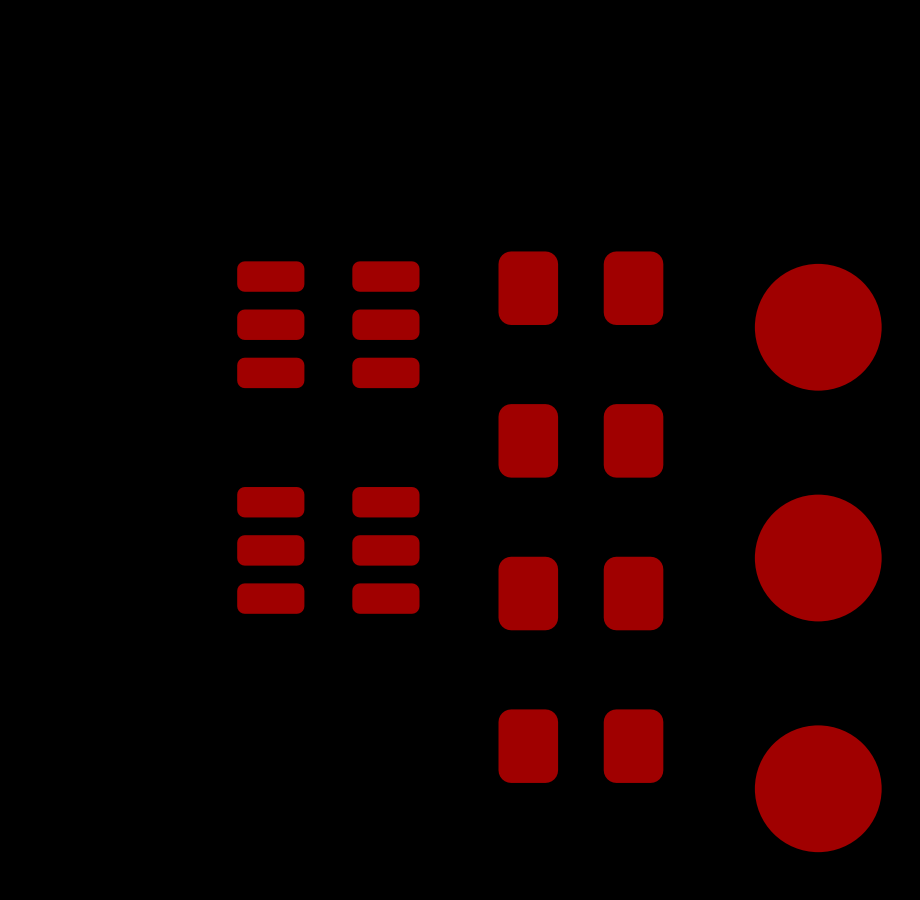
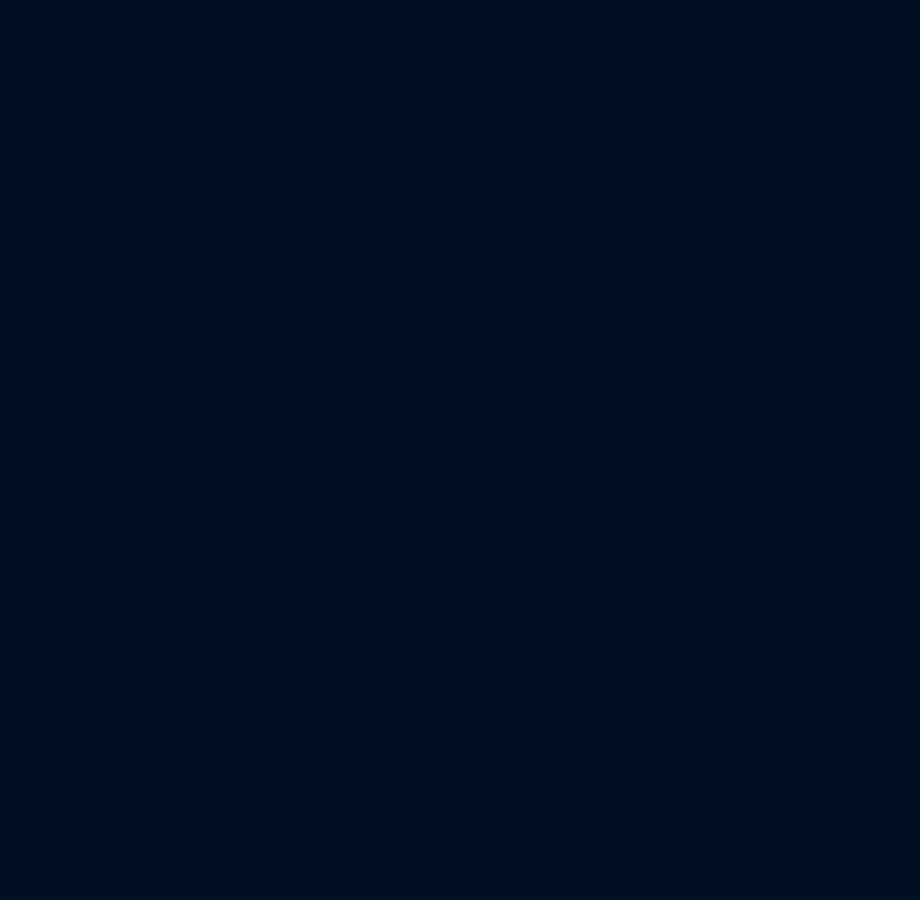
part: (580, 288) -> none
part: (328, 324) -> none
part: (818, 327) -> none
part: (580, 440) -> none
part: (328, 550) -> none
part: (818, 558) -> none
part: (580, 593) -> none
part: (580, 746) -> none
part: (818, 788) -> none

